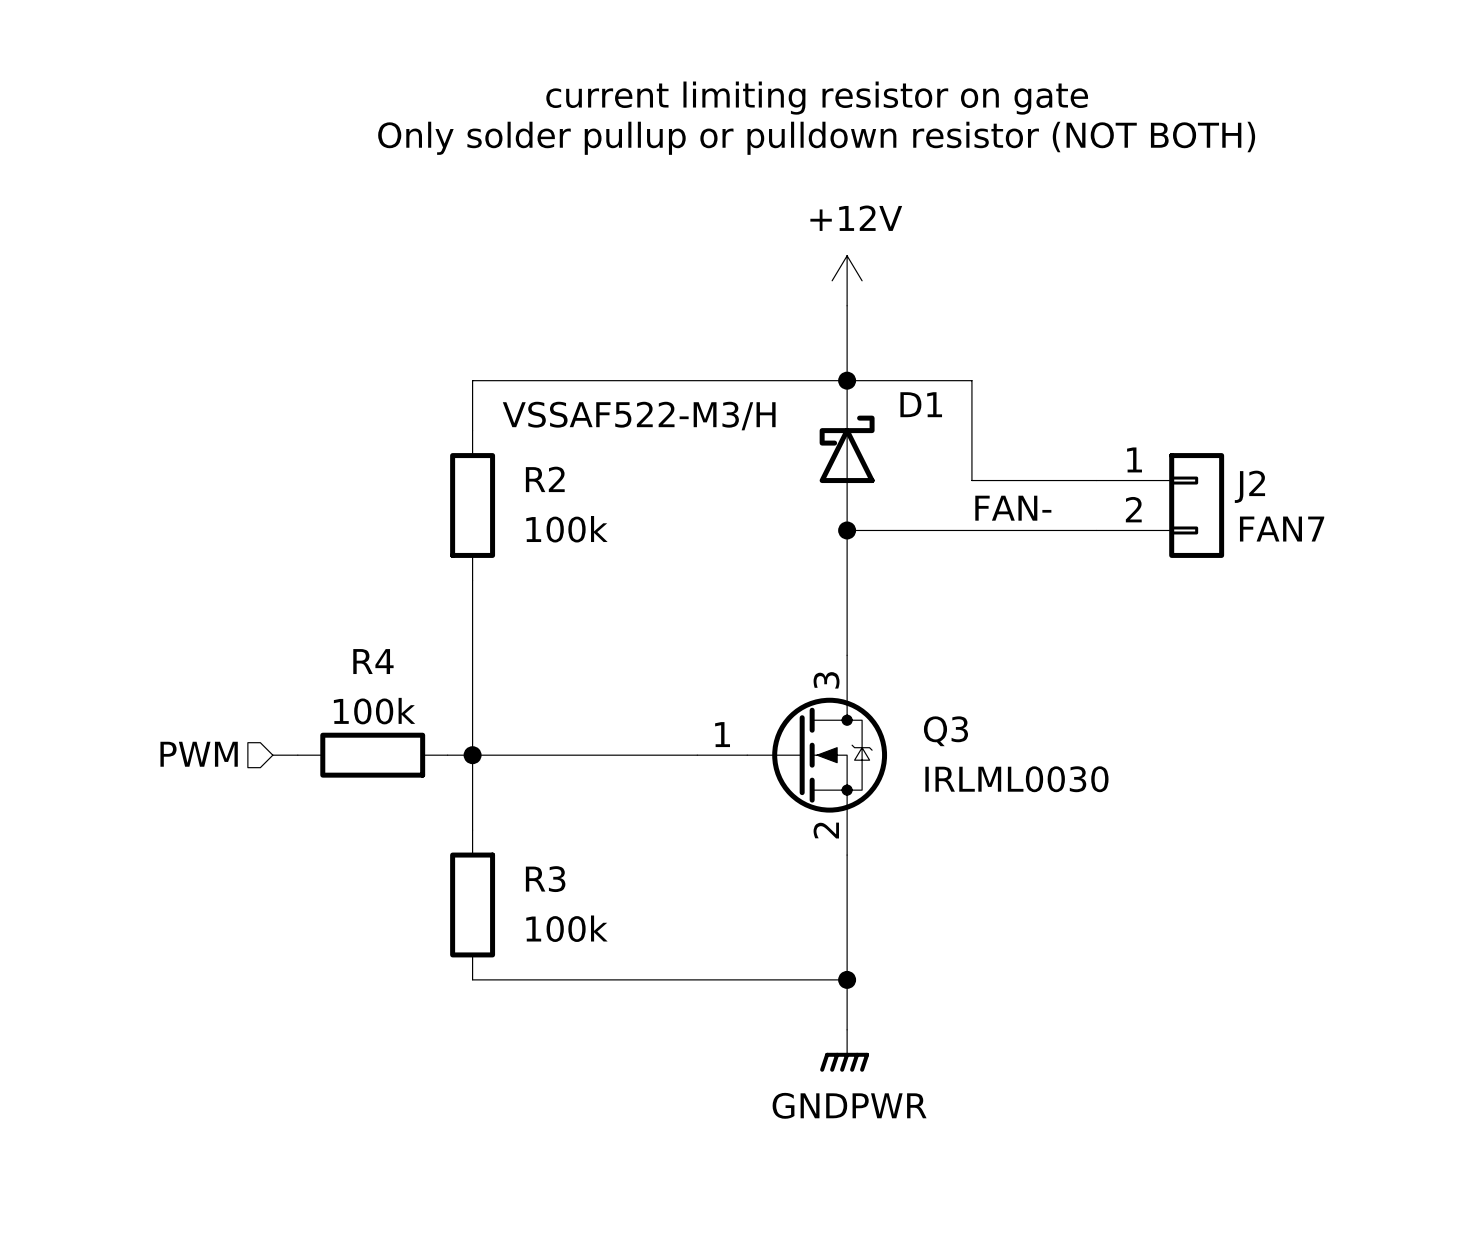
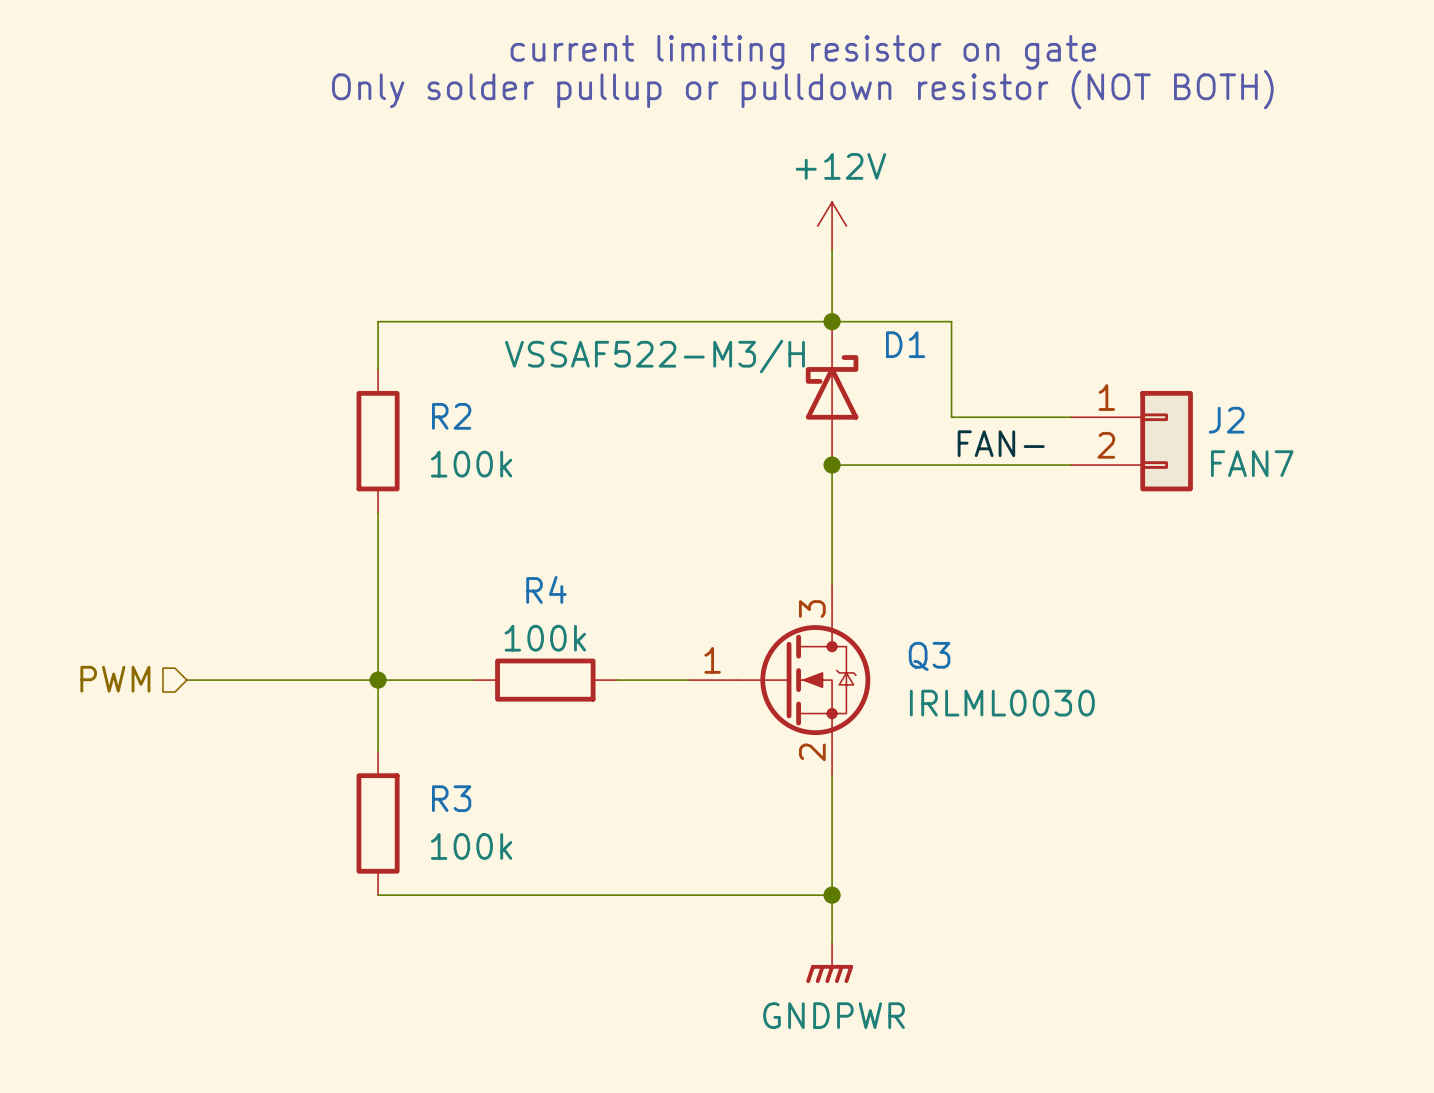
wire: (472, 380) (472, 430) -> (473, 321) (378, 321) (378, 369)
R2 position: (472, 505) -> (378, 441)
wire: (472, 580) (472, 830) -> (378, 512) (378, 751)
hierarchical label position: PWM (199, 754) -> PWM (115, 679)
wire: none -> (186, 680) (282, 680)
R4 position: (372, 755) -> (545, 680)
wire: (472, 755) (622, 755) -> (306, 680) (449, 680)
junction position: (472, 755) -> (378, 680)
R3 position: (472, 904) -> (378, 823)
wire: none -> (378, 895) (473, 895)

